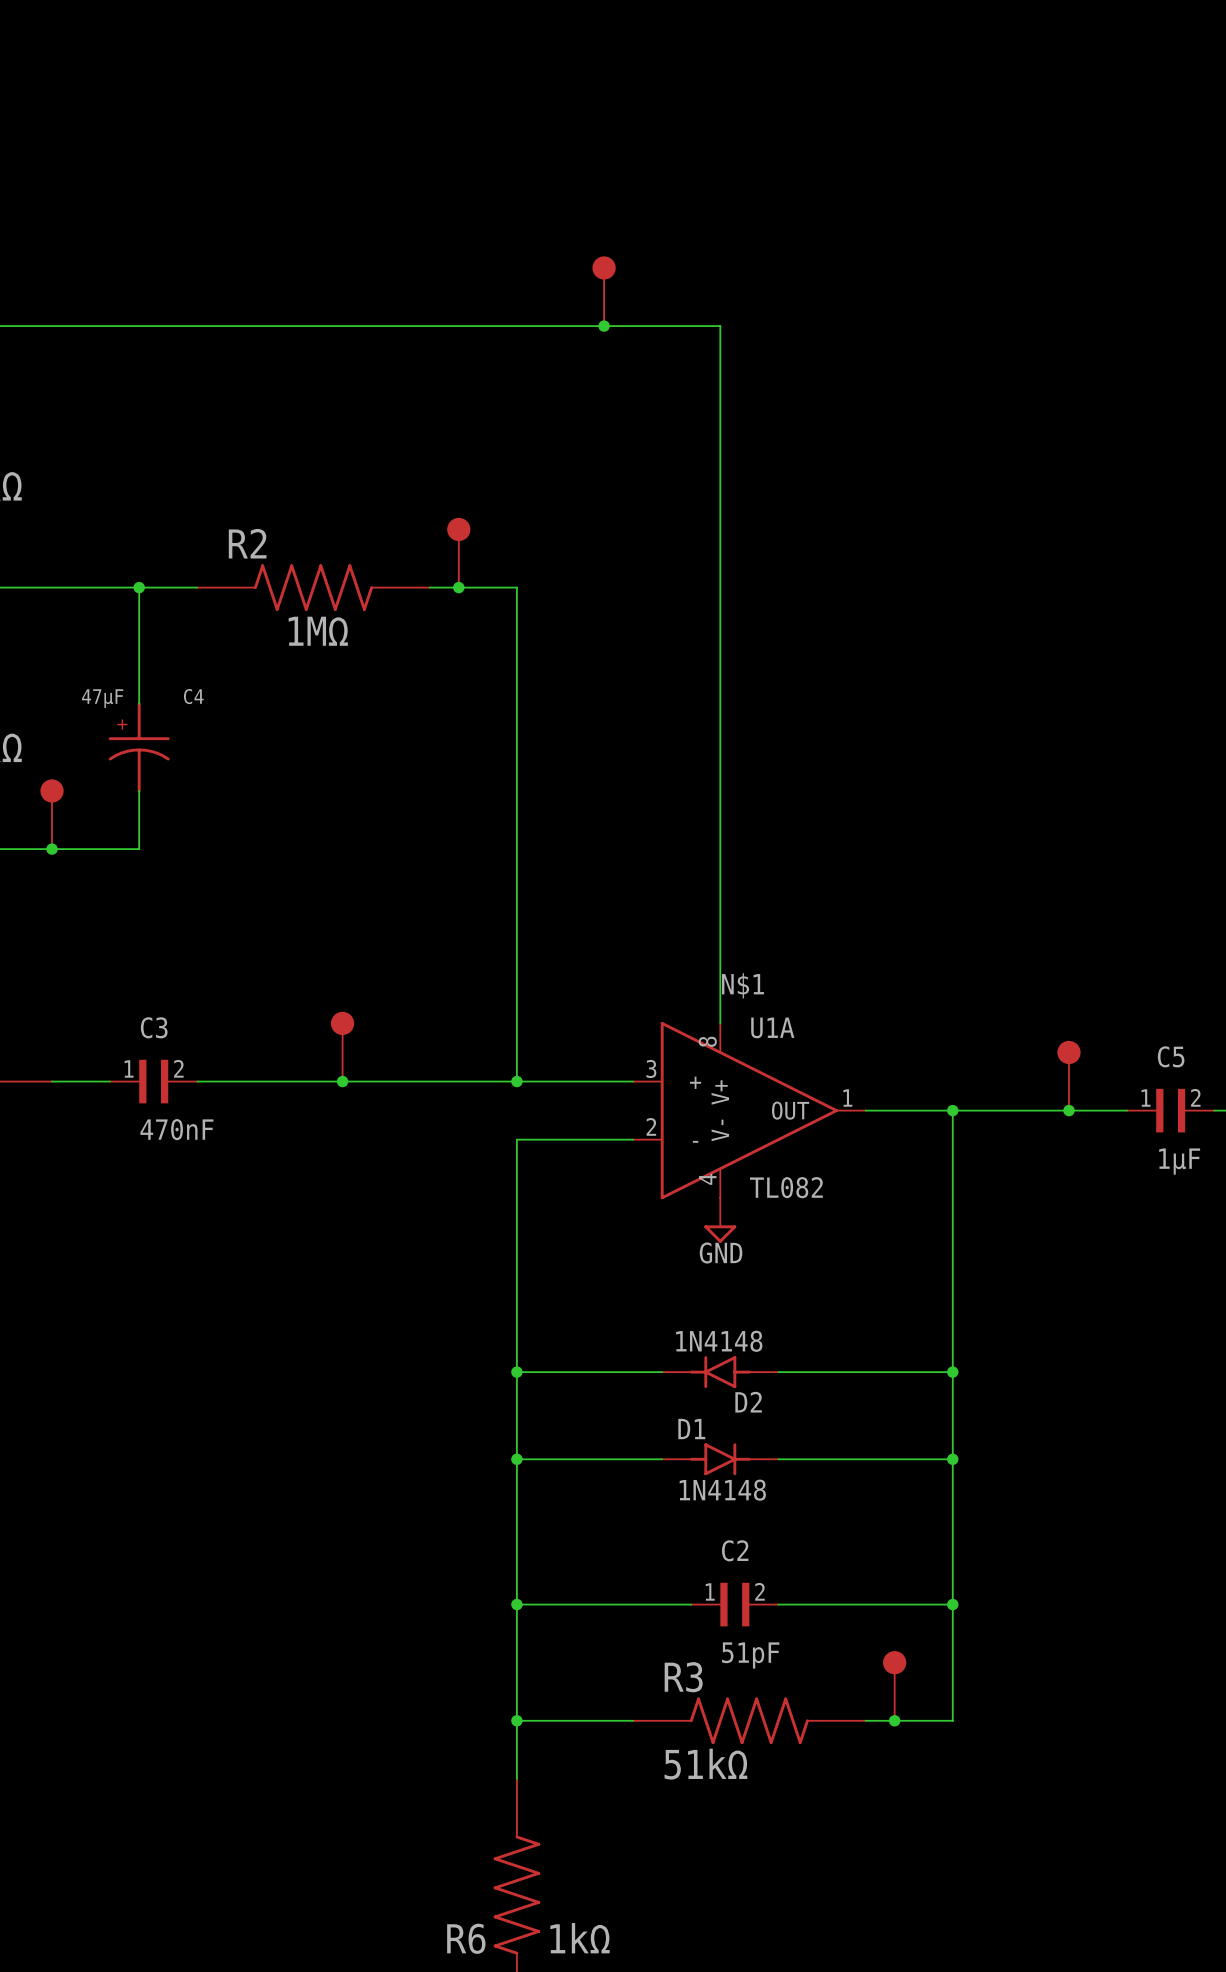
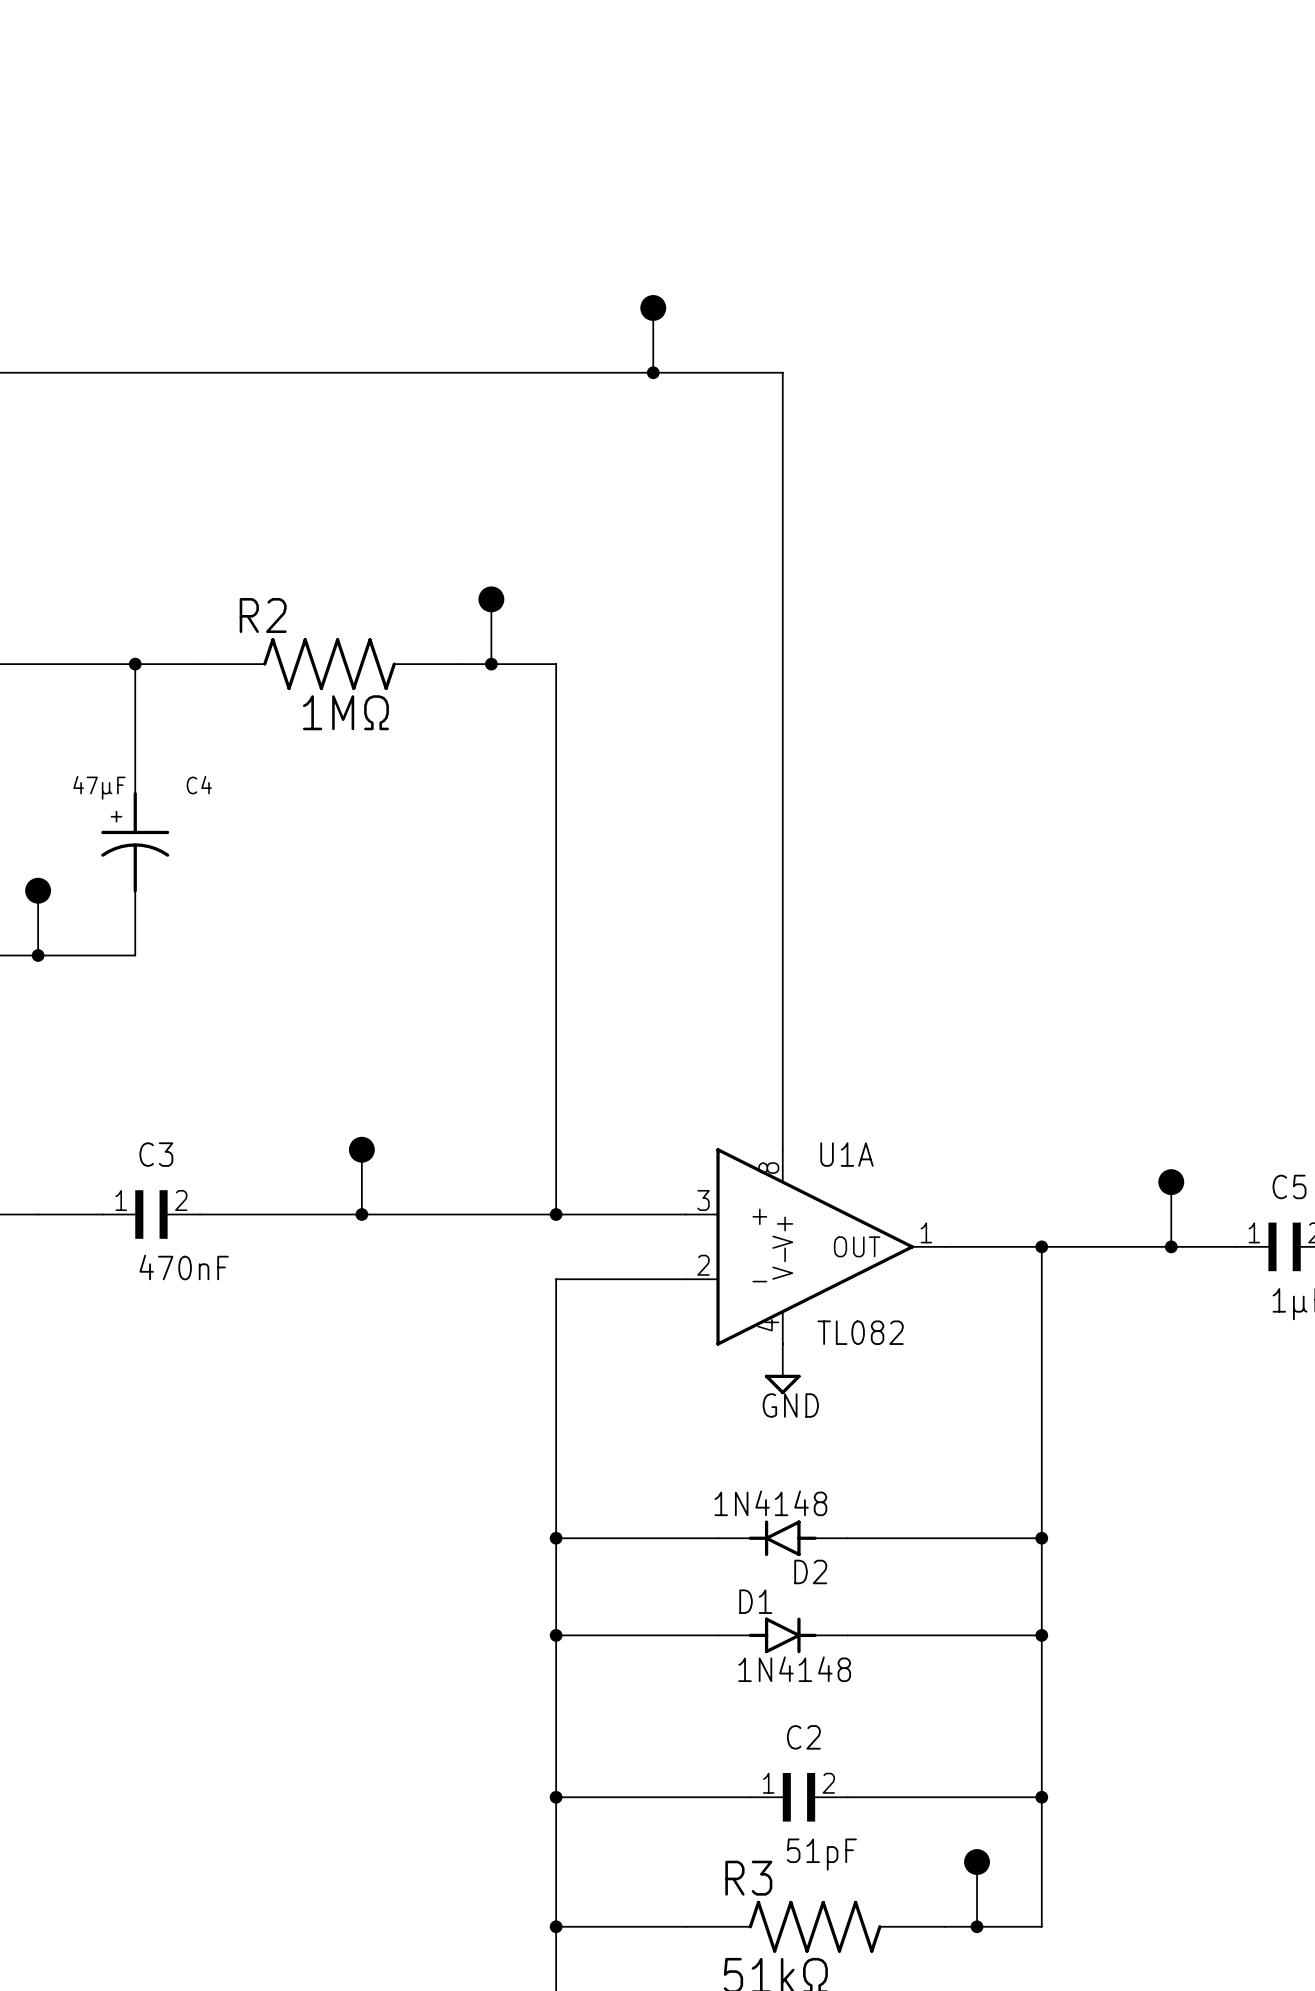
label: N$1 (742, 985) -> none

